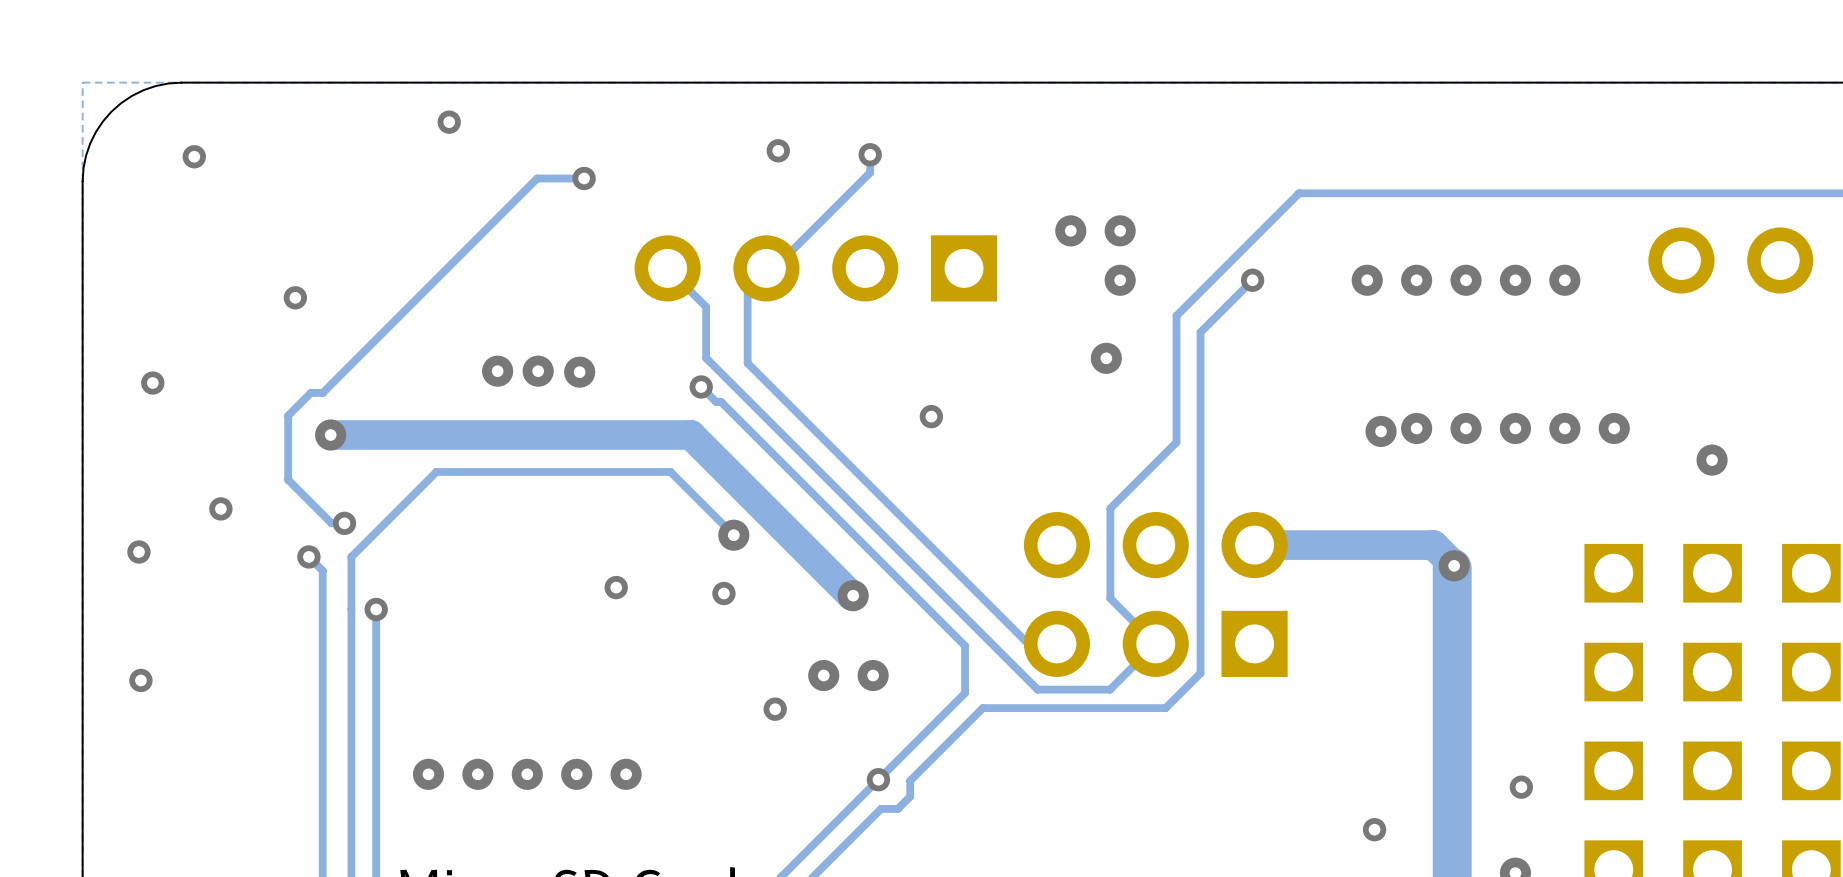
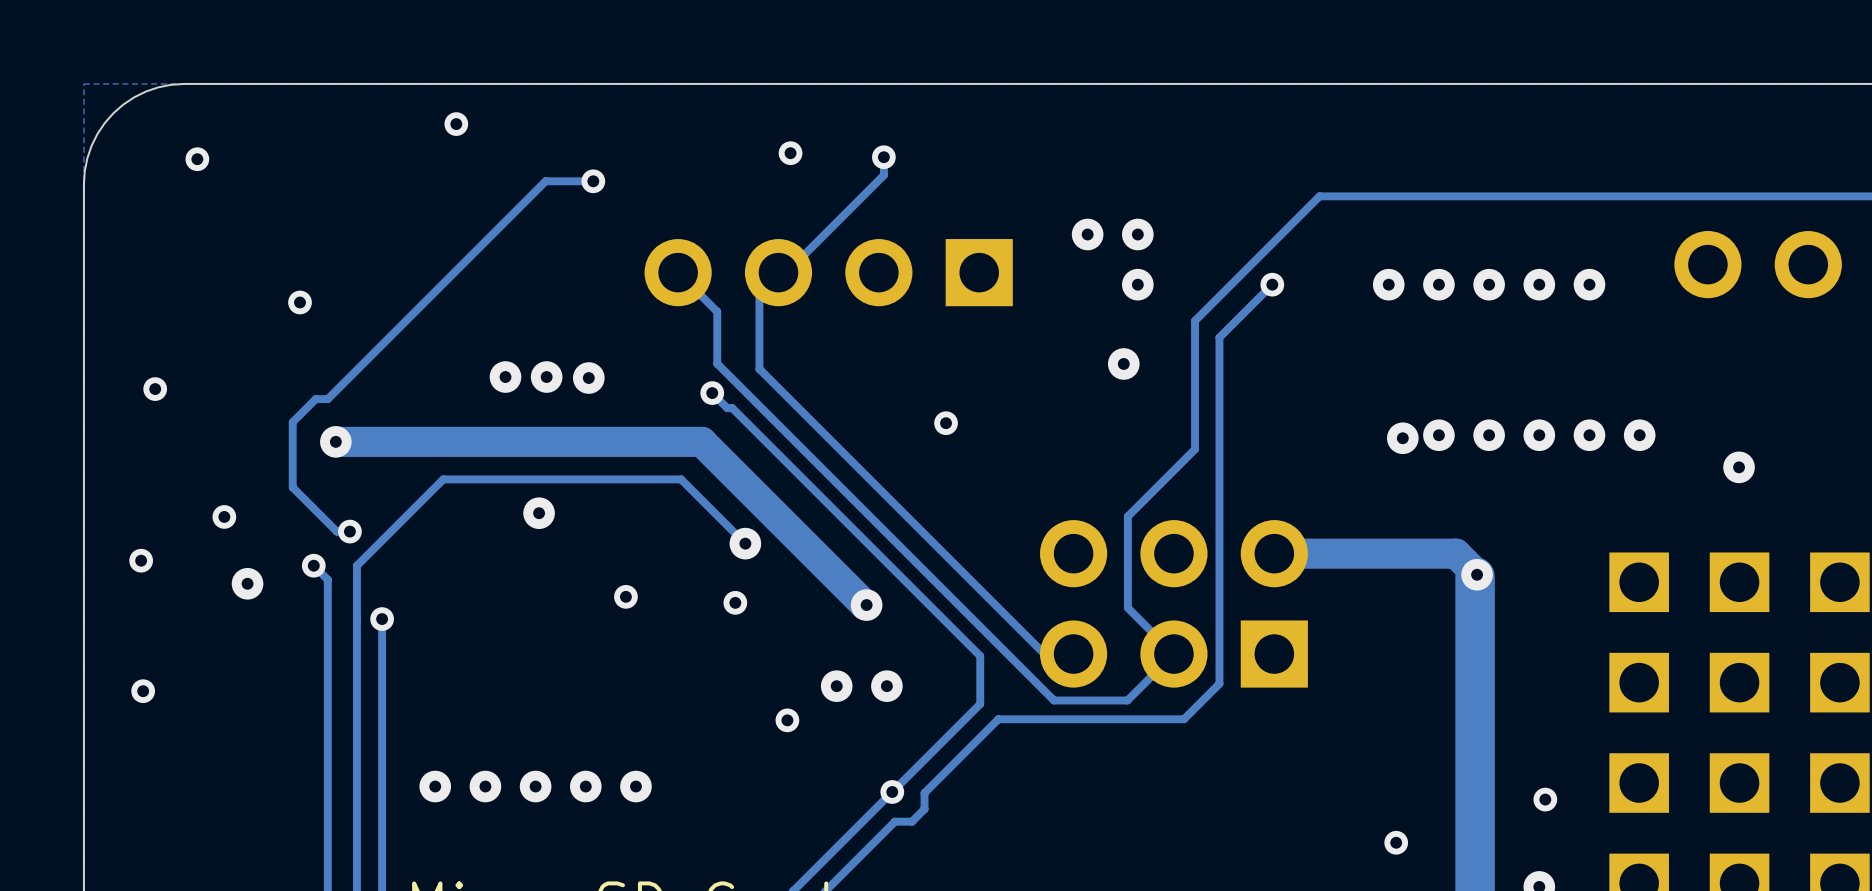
via: none -> (539, 513)
via: none -> (247, 583)

